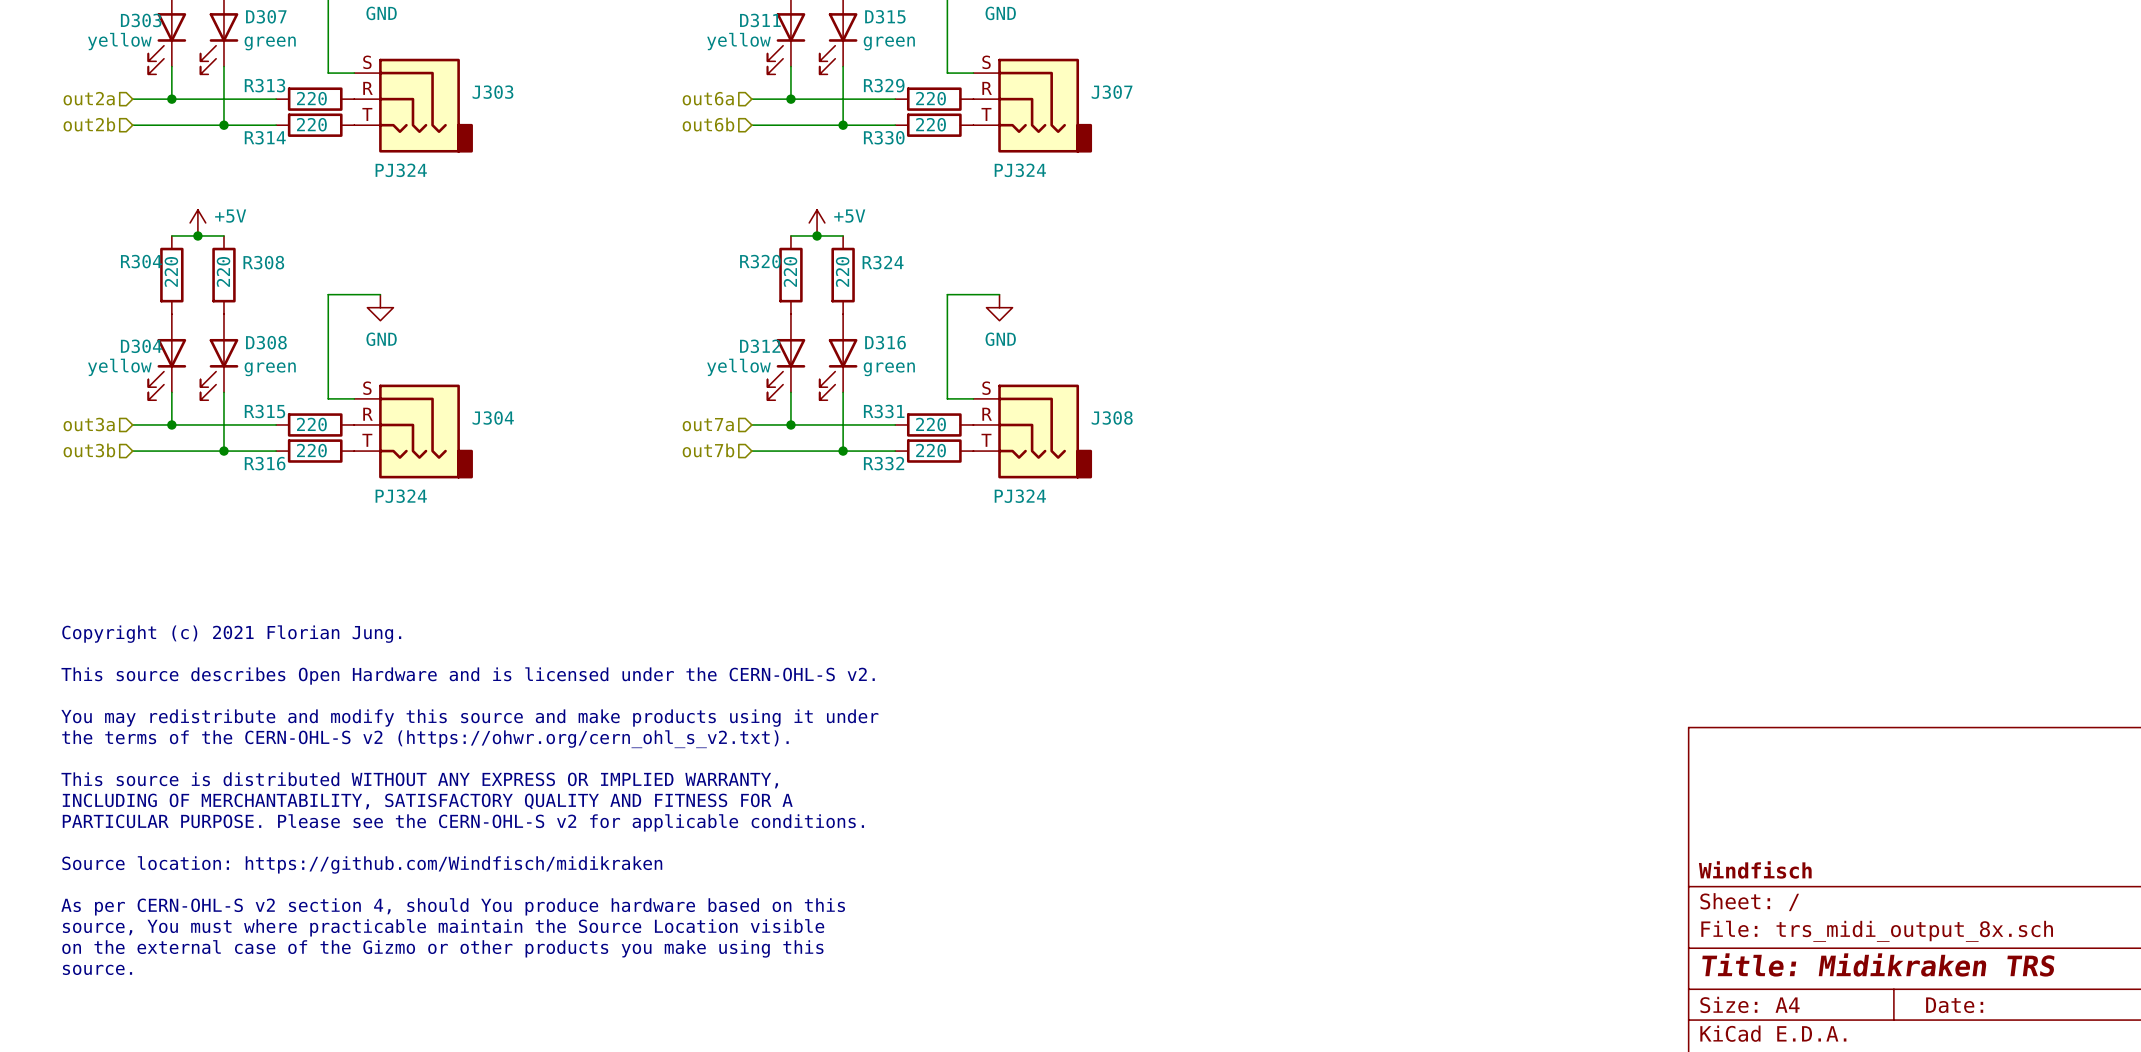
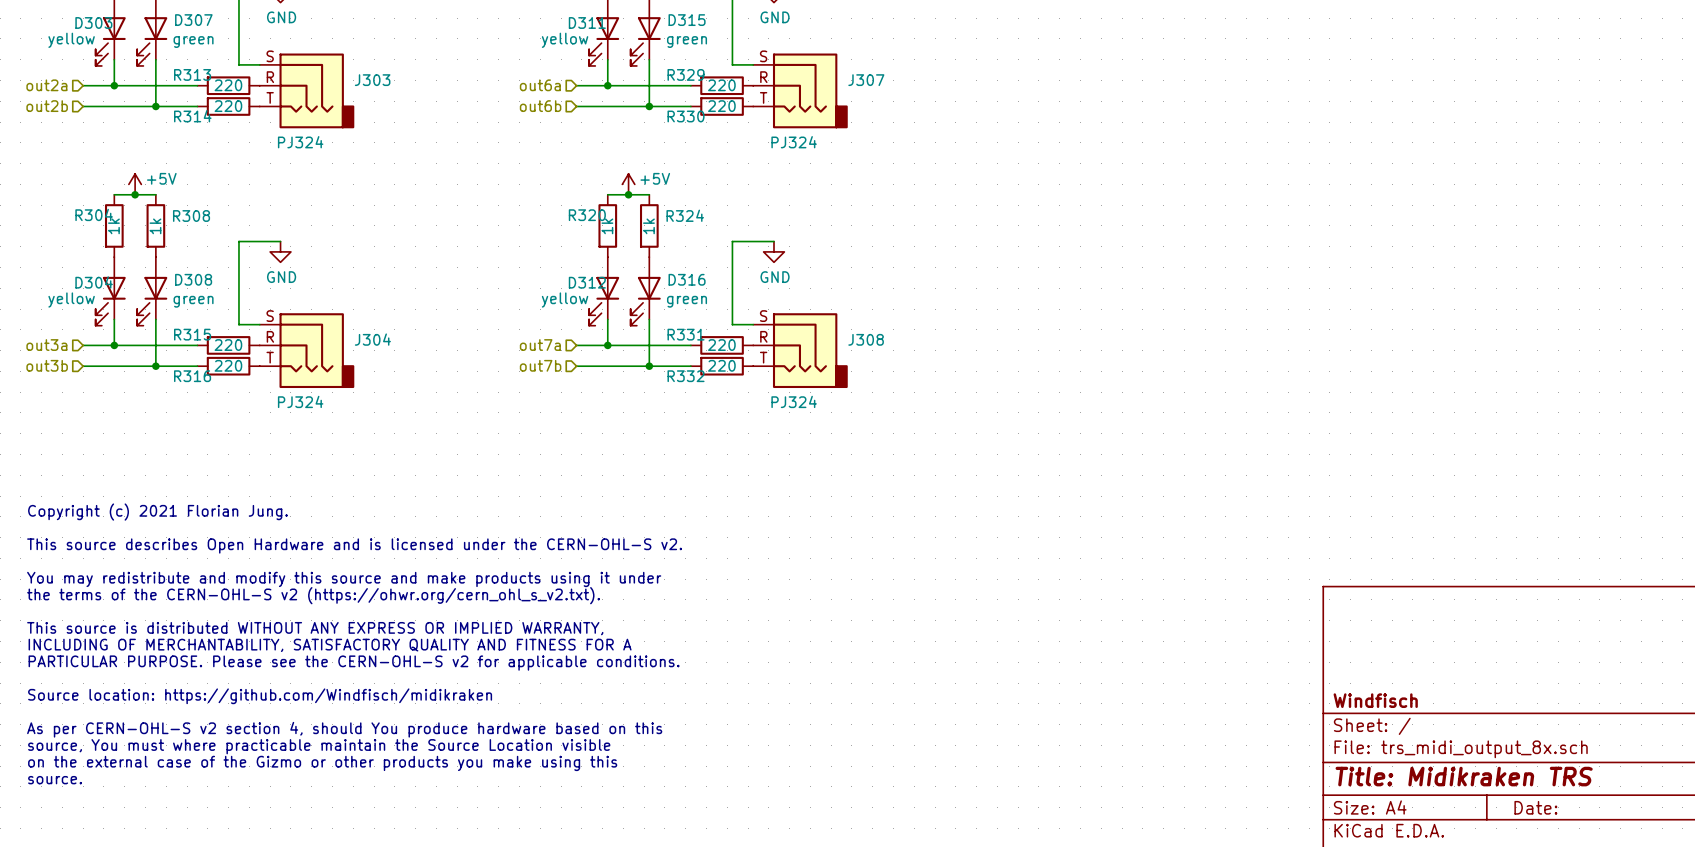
R304 value: 220 (171, 271) -> 1k (113, 226)
R308 value: 220 (223, 271) -> 1k (155, 226)
R320 value: 220 (790, 271) -> 1k (607, 226)
R324 value: 220 (842, 271) -> 1k (648, 226)

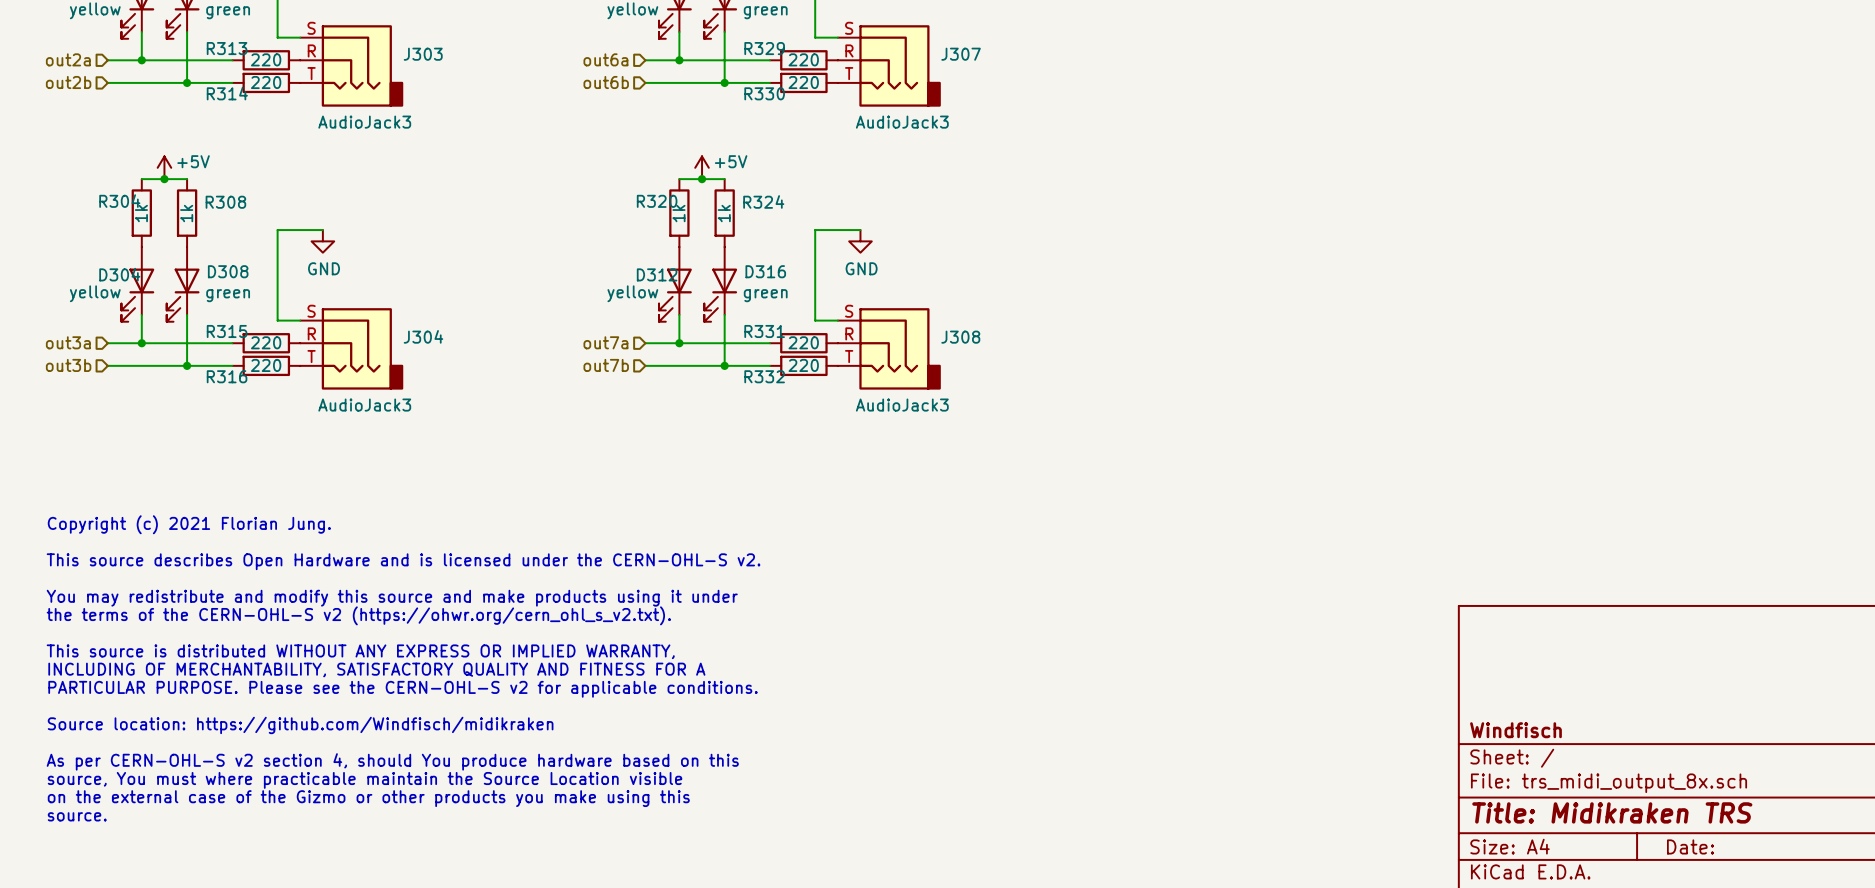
J303 value: PJ324 (300, 142) -> AudioJack3 (364, 122)
J307 value: PJ324 (794, 142) -> AudioJack3 (902, 122)
J304 value: PJ324 (300, 401) -> AudioJack3 (364, 405)
J308 value: PJ324 (794, 401) -> AudioJack3 (902, 405)

